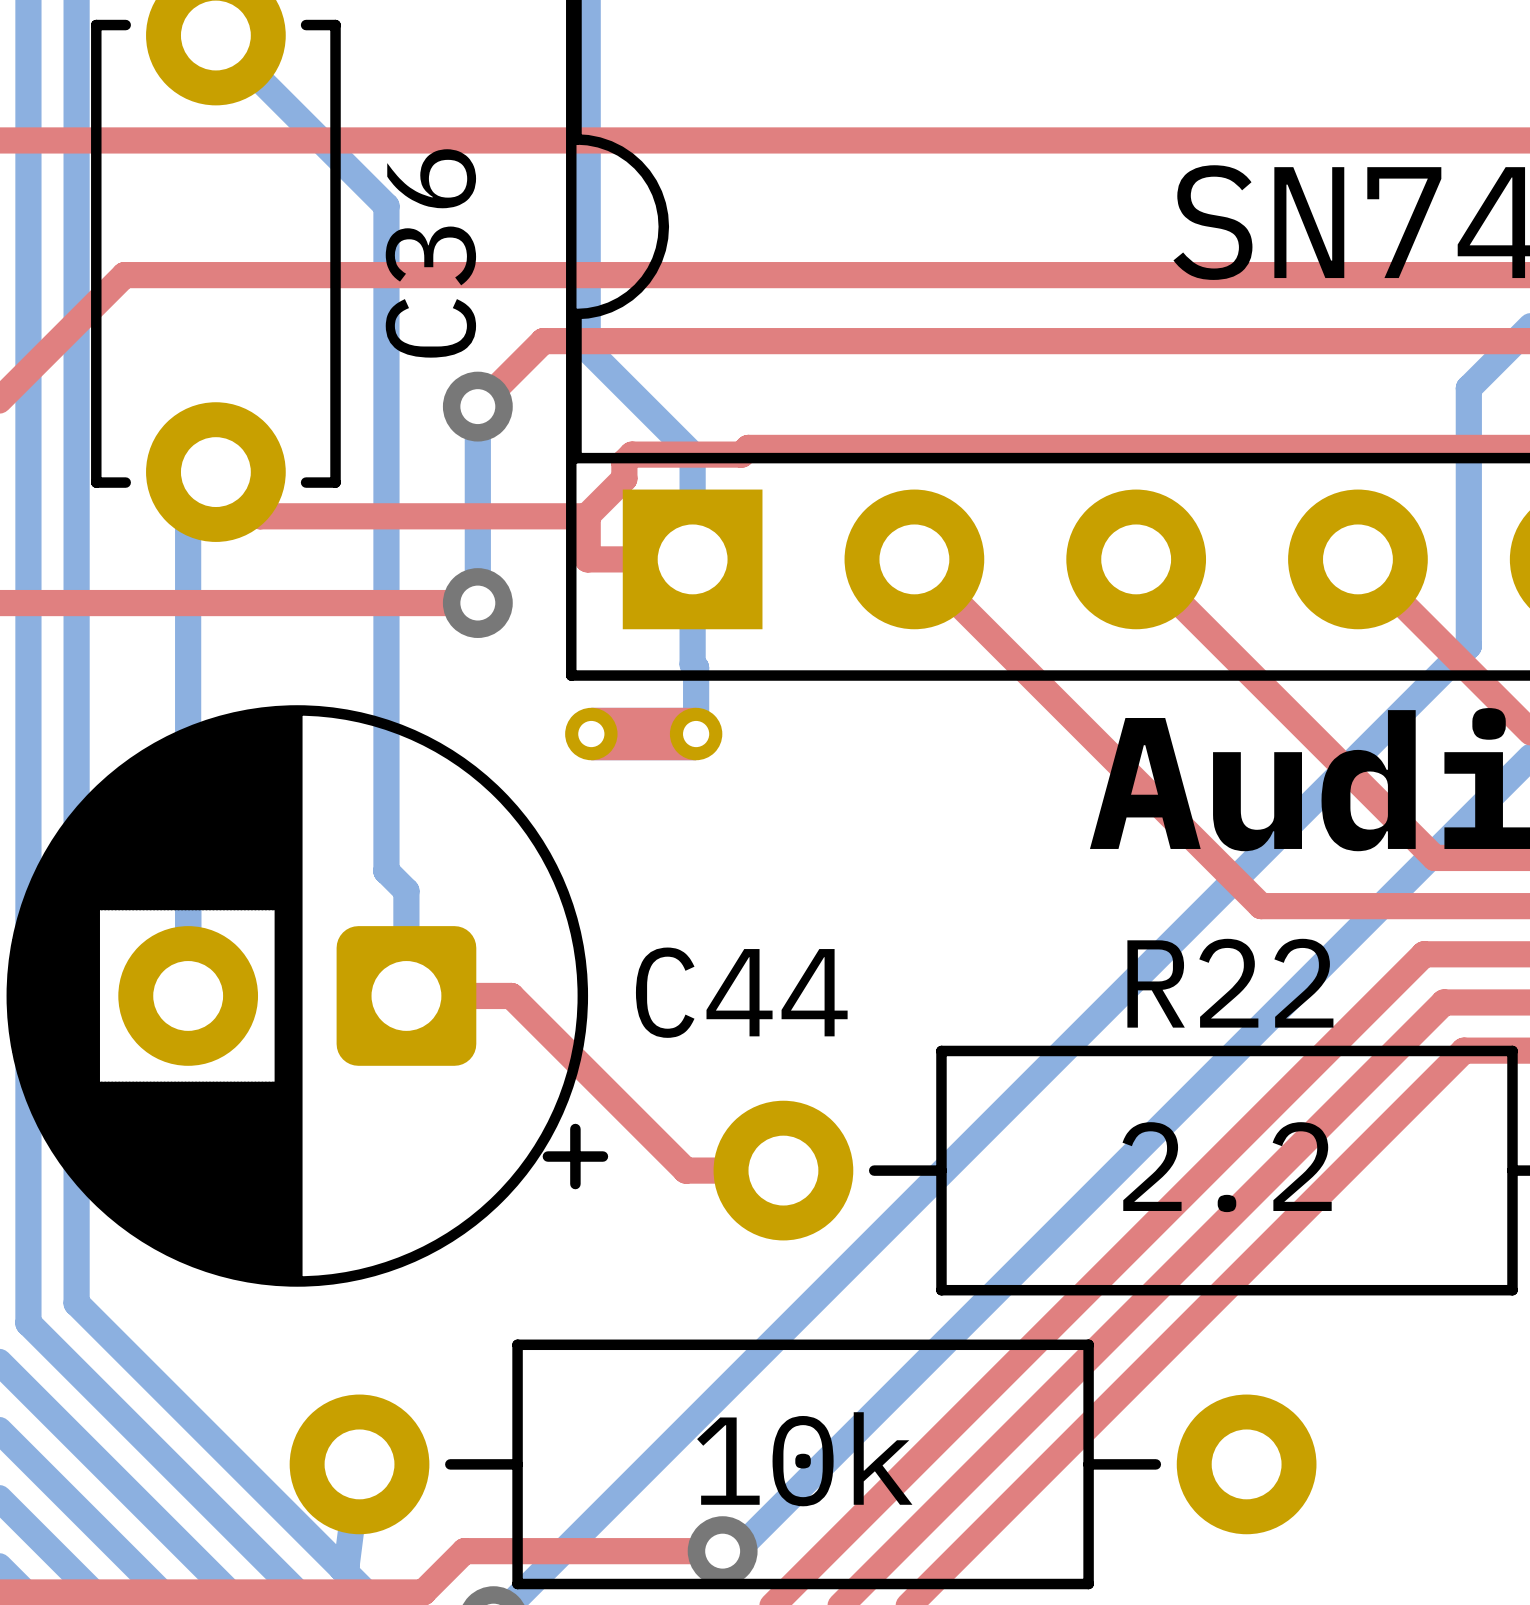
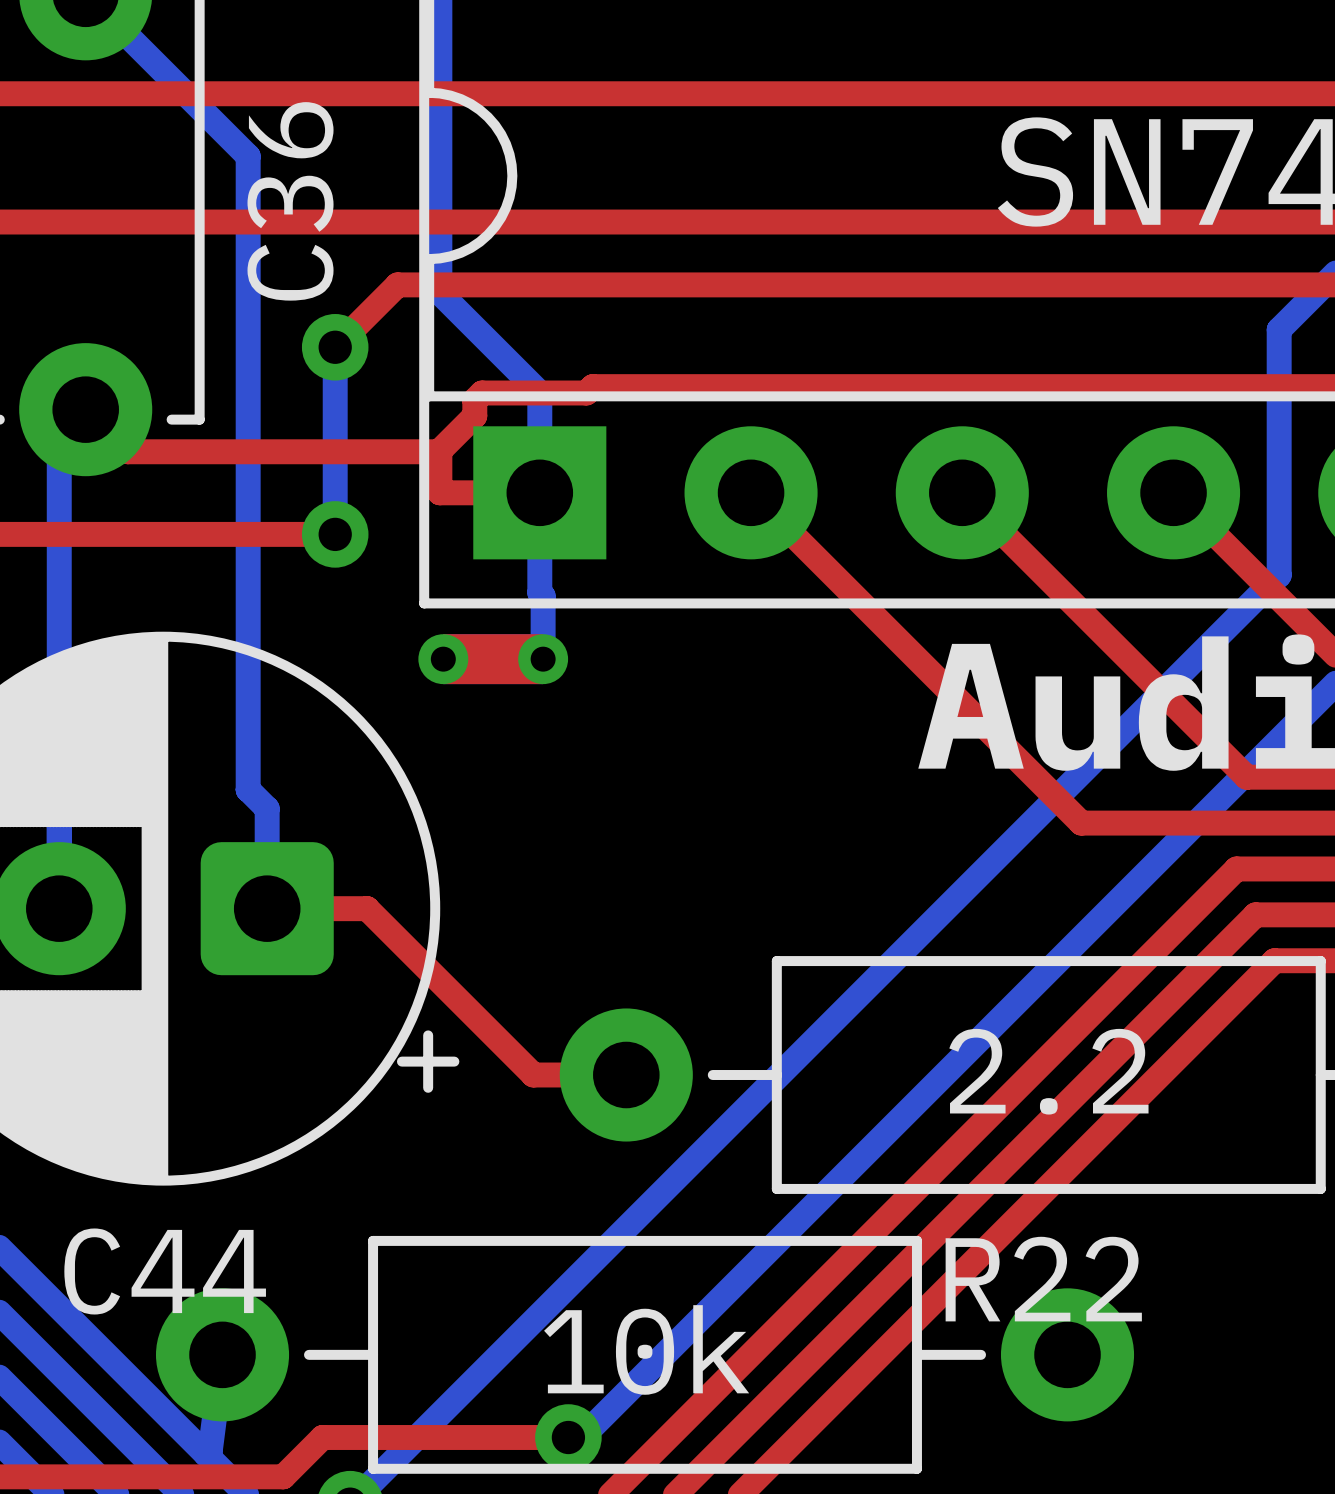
R22 name position: R22 (1230, 983) -> R22 (1043, 1279)
C44 name position: C44 (741, 992) -> C44 (165, 1271)

